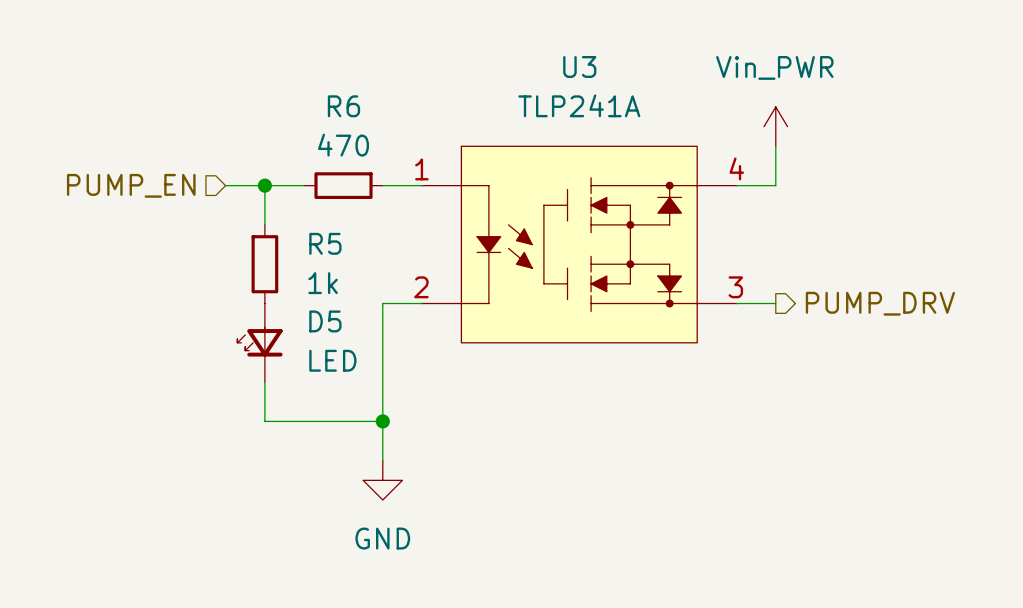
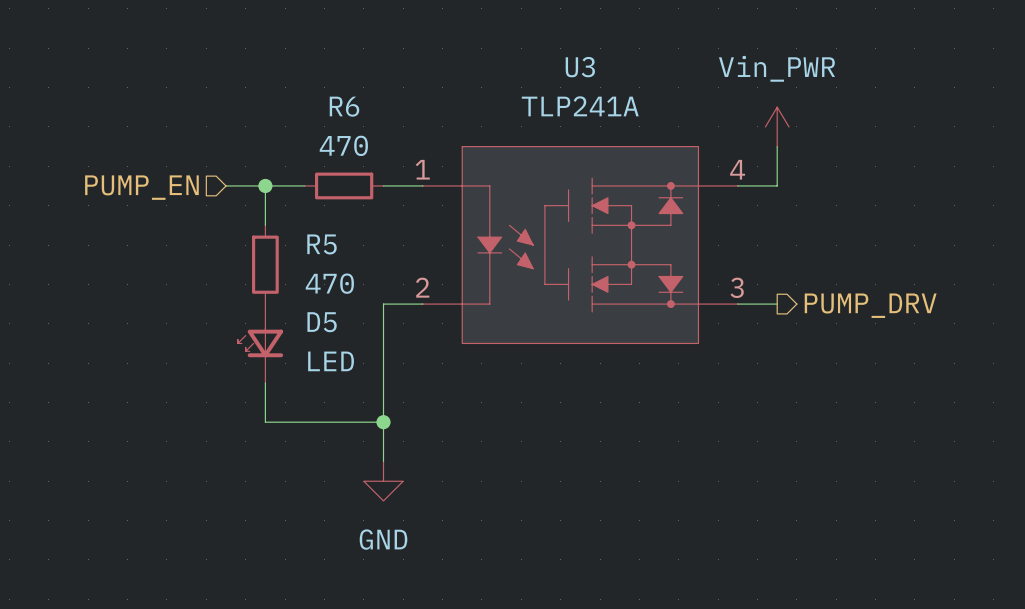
R5 value: 1k (323, 283) -> 470 (329, 283)

